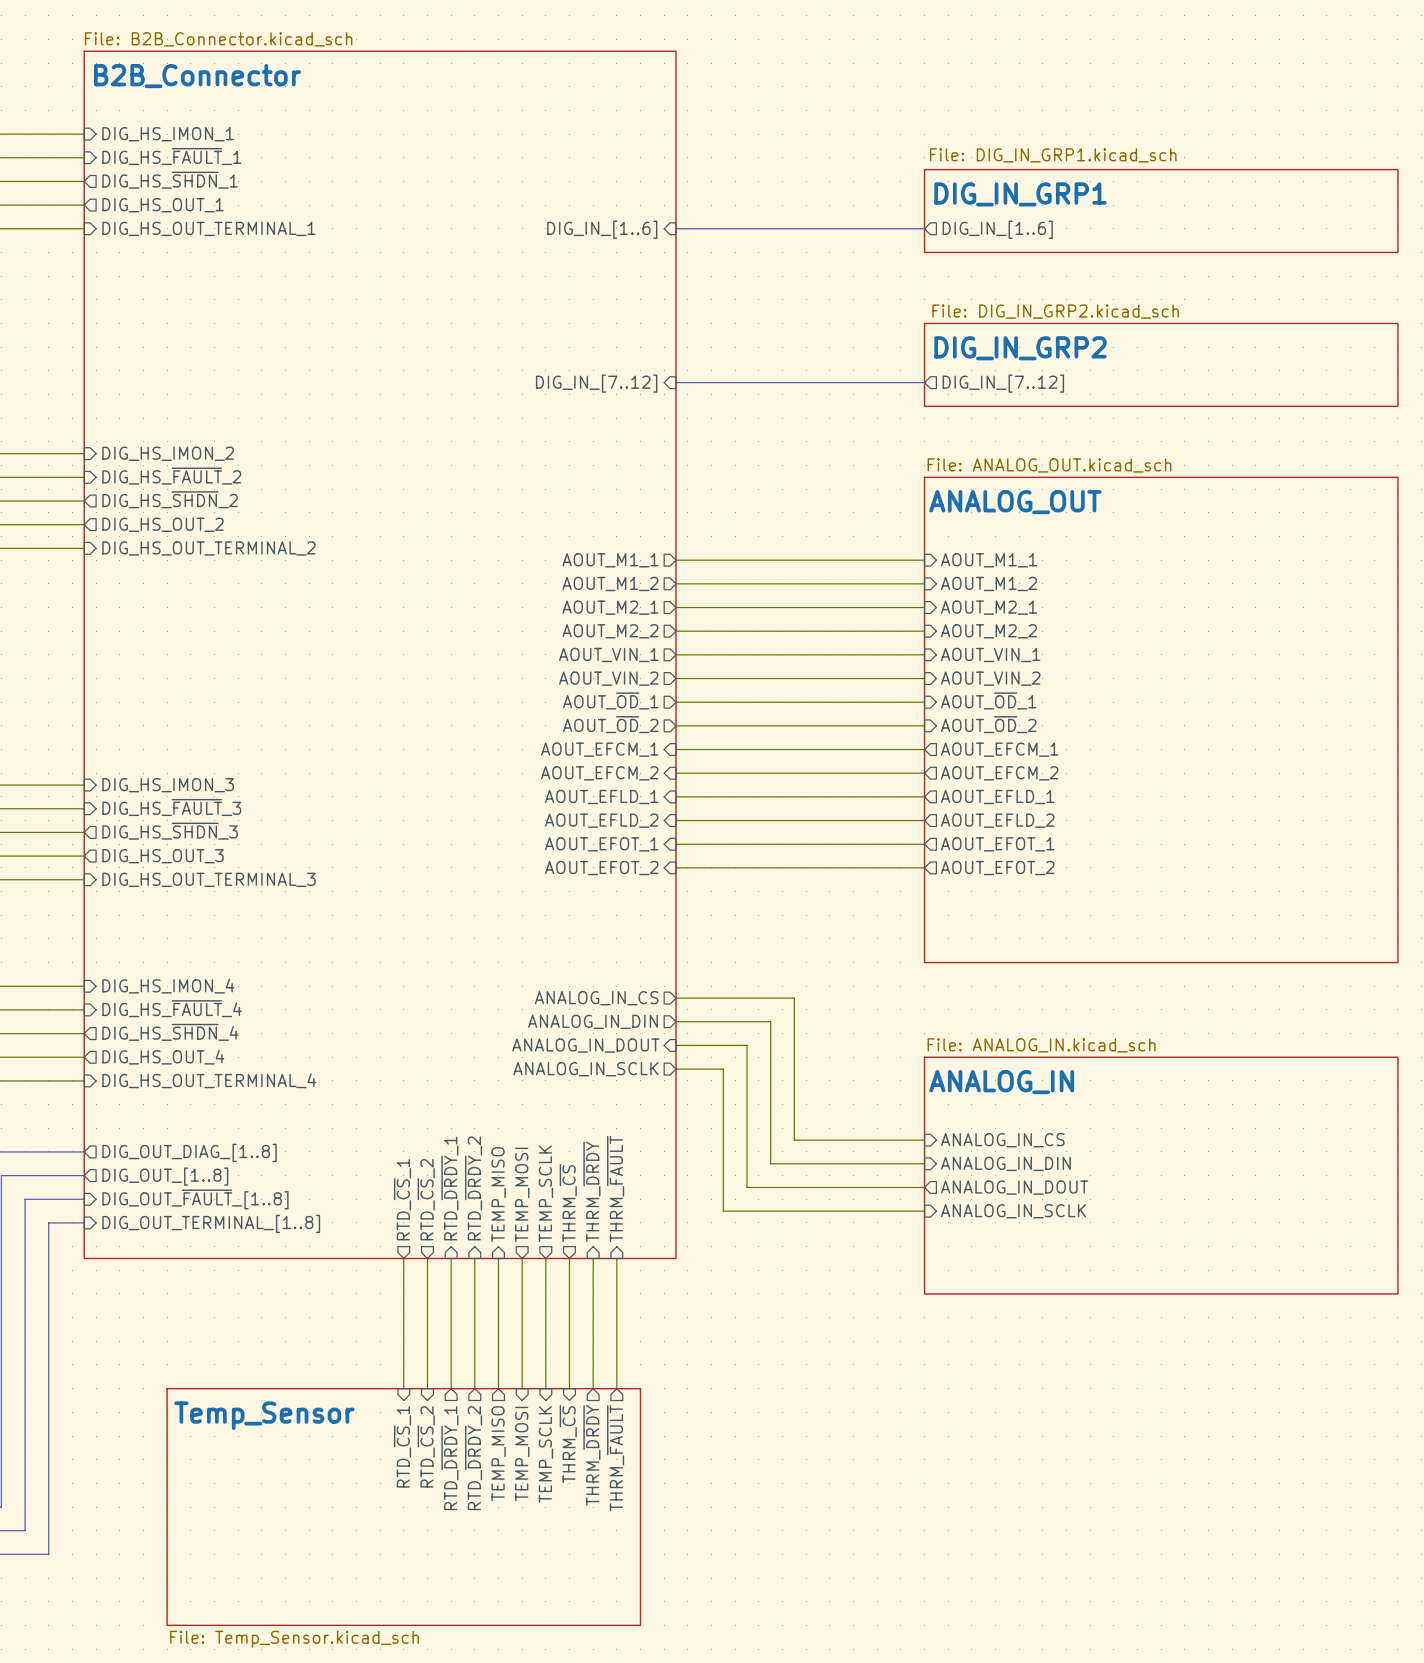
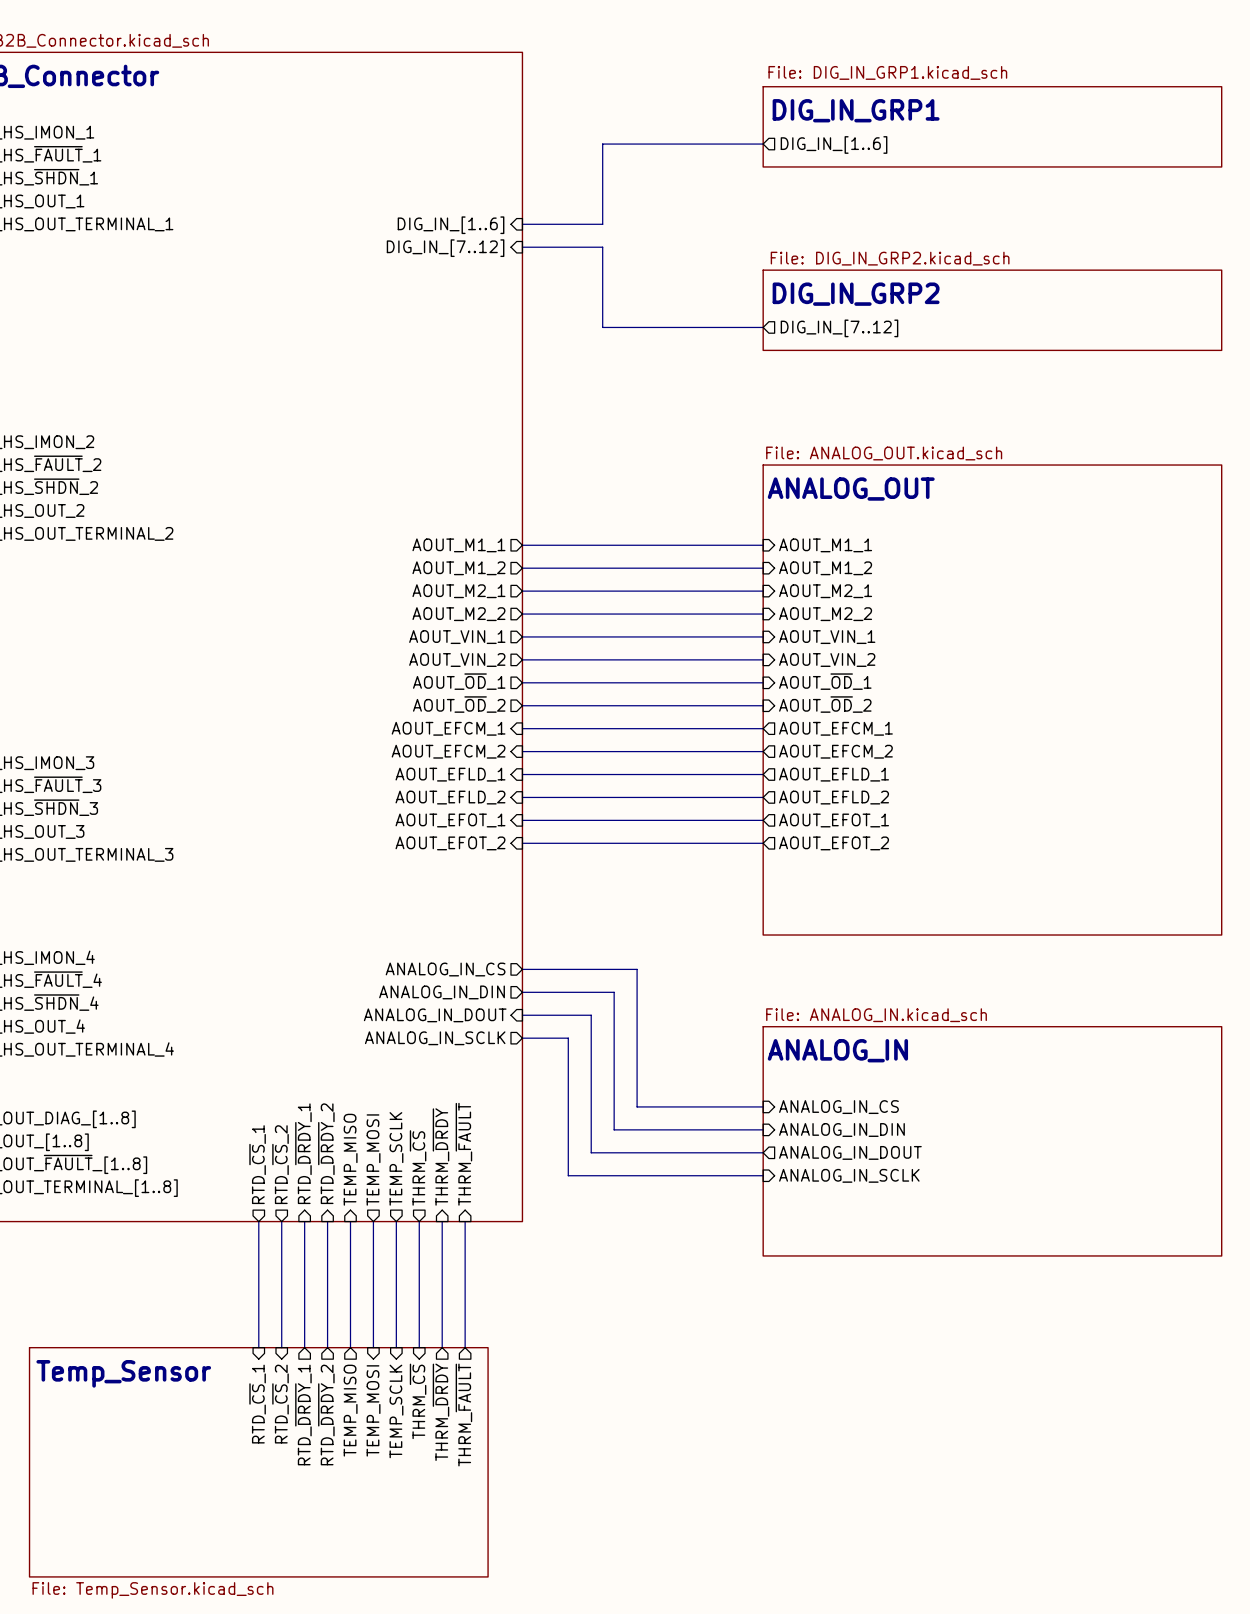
sheet DIG_IN_GRP1 position: (1161, 211) -> (992, 126)
bus: (758, 228) (924, 228) -> (602, 224) (602, 144) (763, 144)
sheet pin position: DIG_IN_[1..6] (997, 229) -> DIG_IN_[1..6] (834, 144)
bus: none -> (522, 247) (602, 247) (602, 327) (763, 327)
sheet DIG_IN_GRP2 position: (1161, 364) -> (992, 310)
bus: (676, 382) (924, 382) -> none
sheet pin position: DIG_IN_[7..12] (596, 383) -> DIG_IN_[7..12] (445, 248)
sheet pin position: DIG_IN_[7..12] (1003, 383) -> DIG_IN_[7..12] (839, 328)

